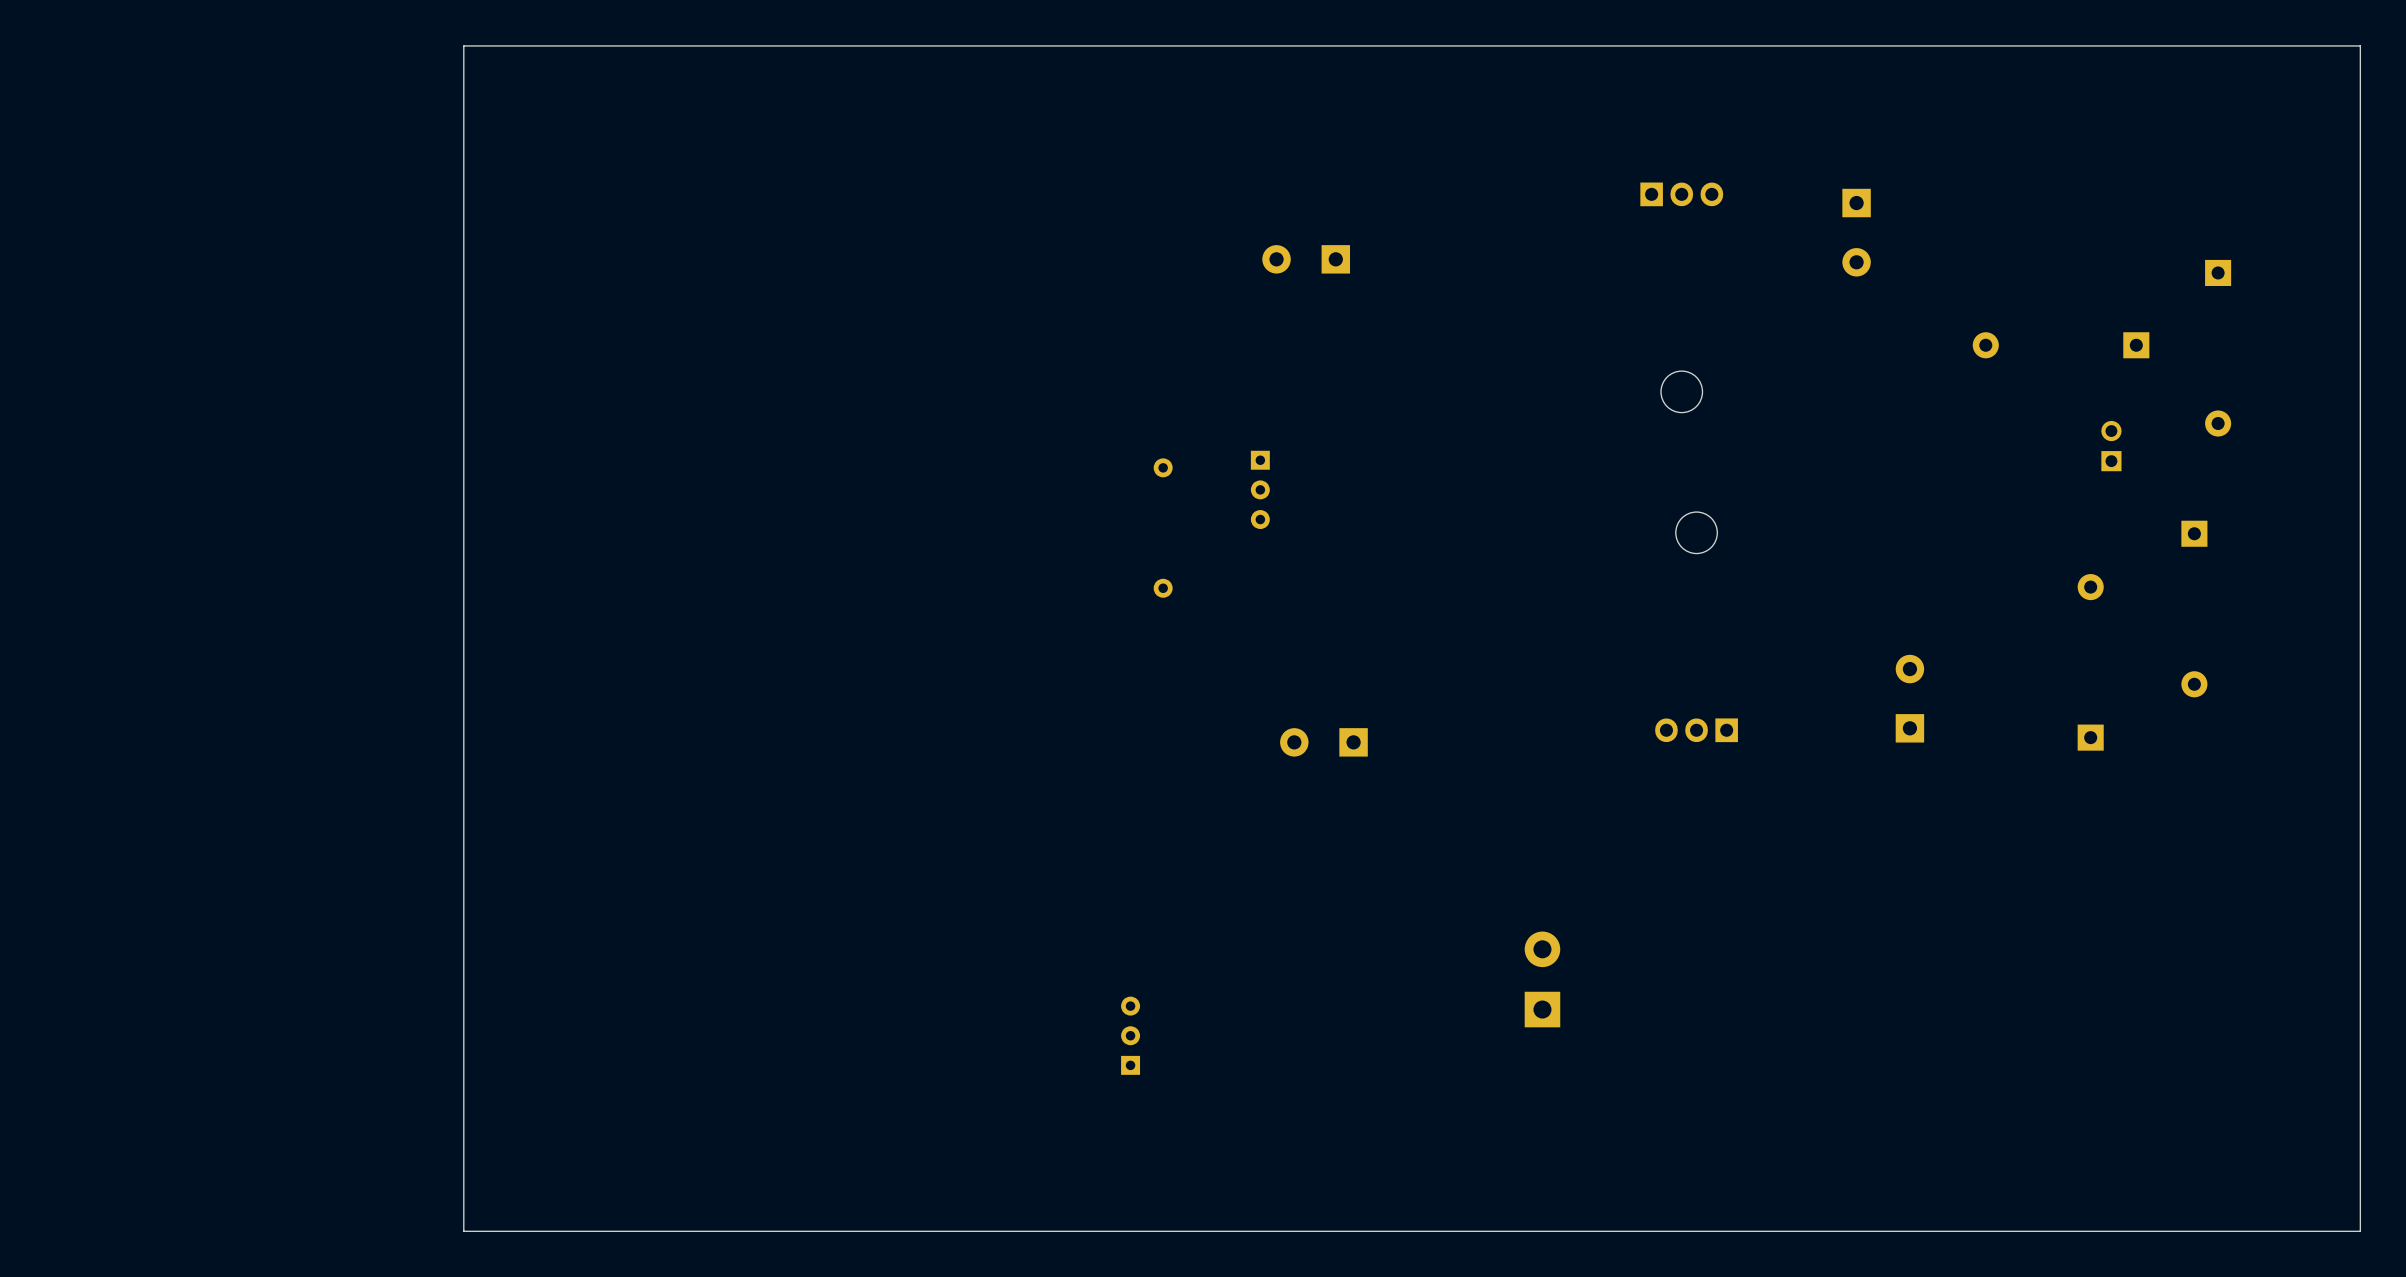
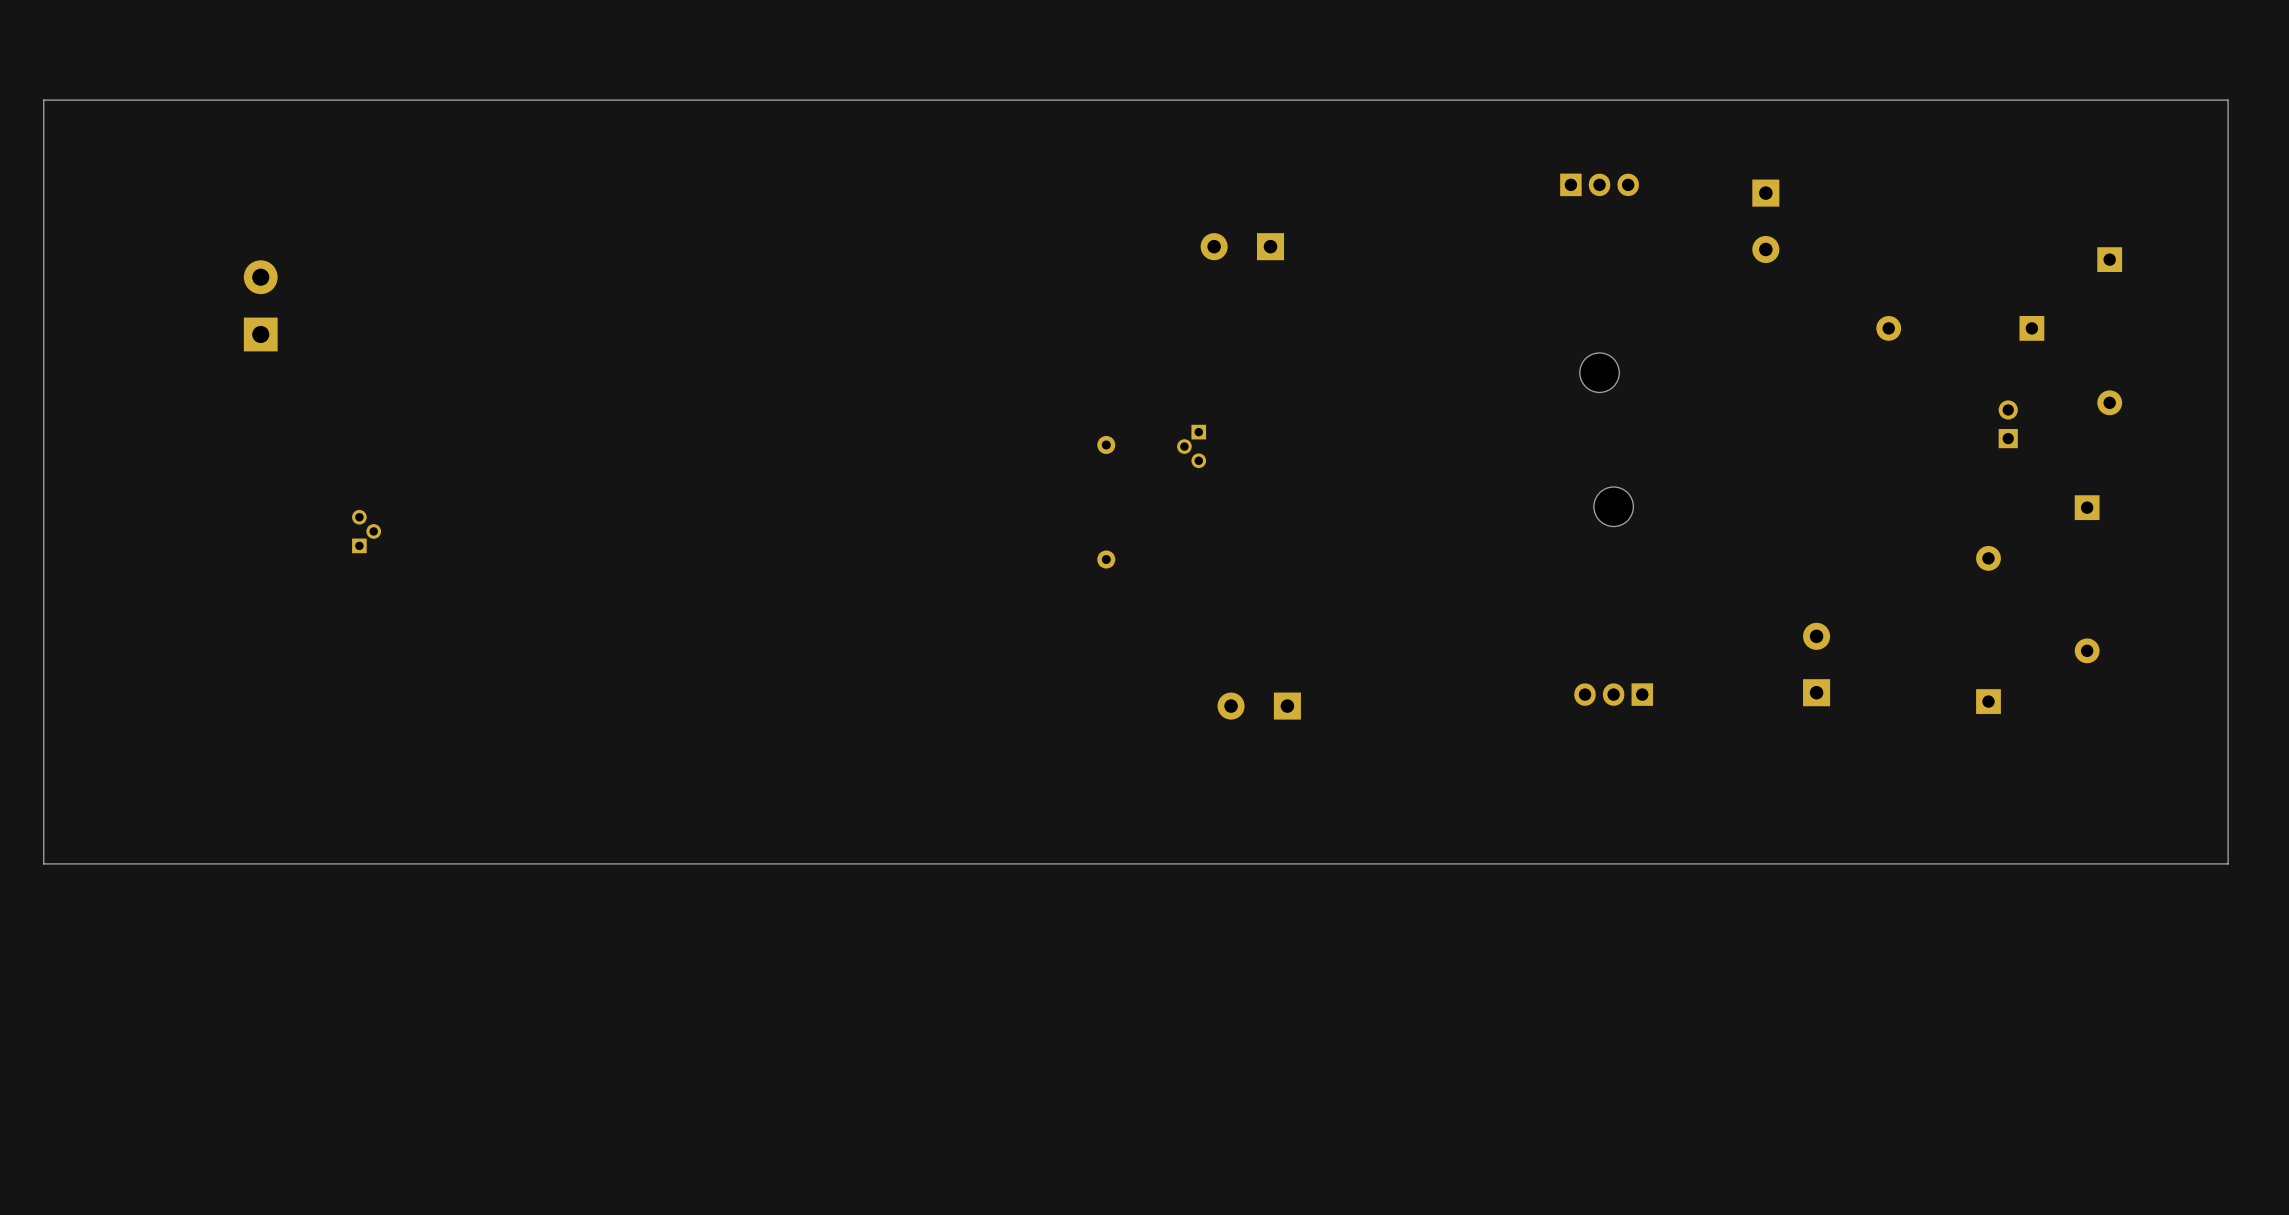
board edge: (2360, 45) (463, 45) (463, 1231) (2360, 1231) (2360, 45) -> (2228, 100) (2228, 863) (43, 863) (43, 100) (2228, 100)
part: none -> (260, 305)
part: none -> (1191, 446)
part: (1260, 489) -> none
part: none -> (366, 531)
part: (1542, 979) -> none
part: (1130, 1035) -> none

